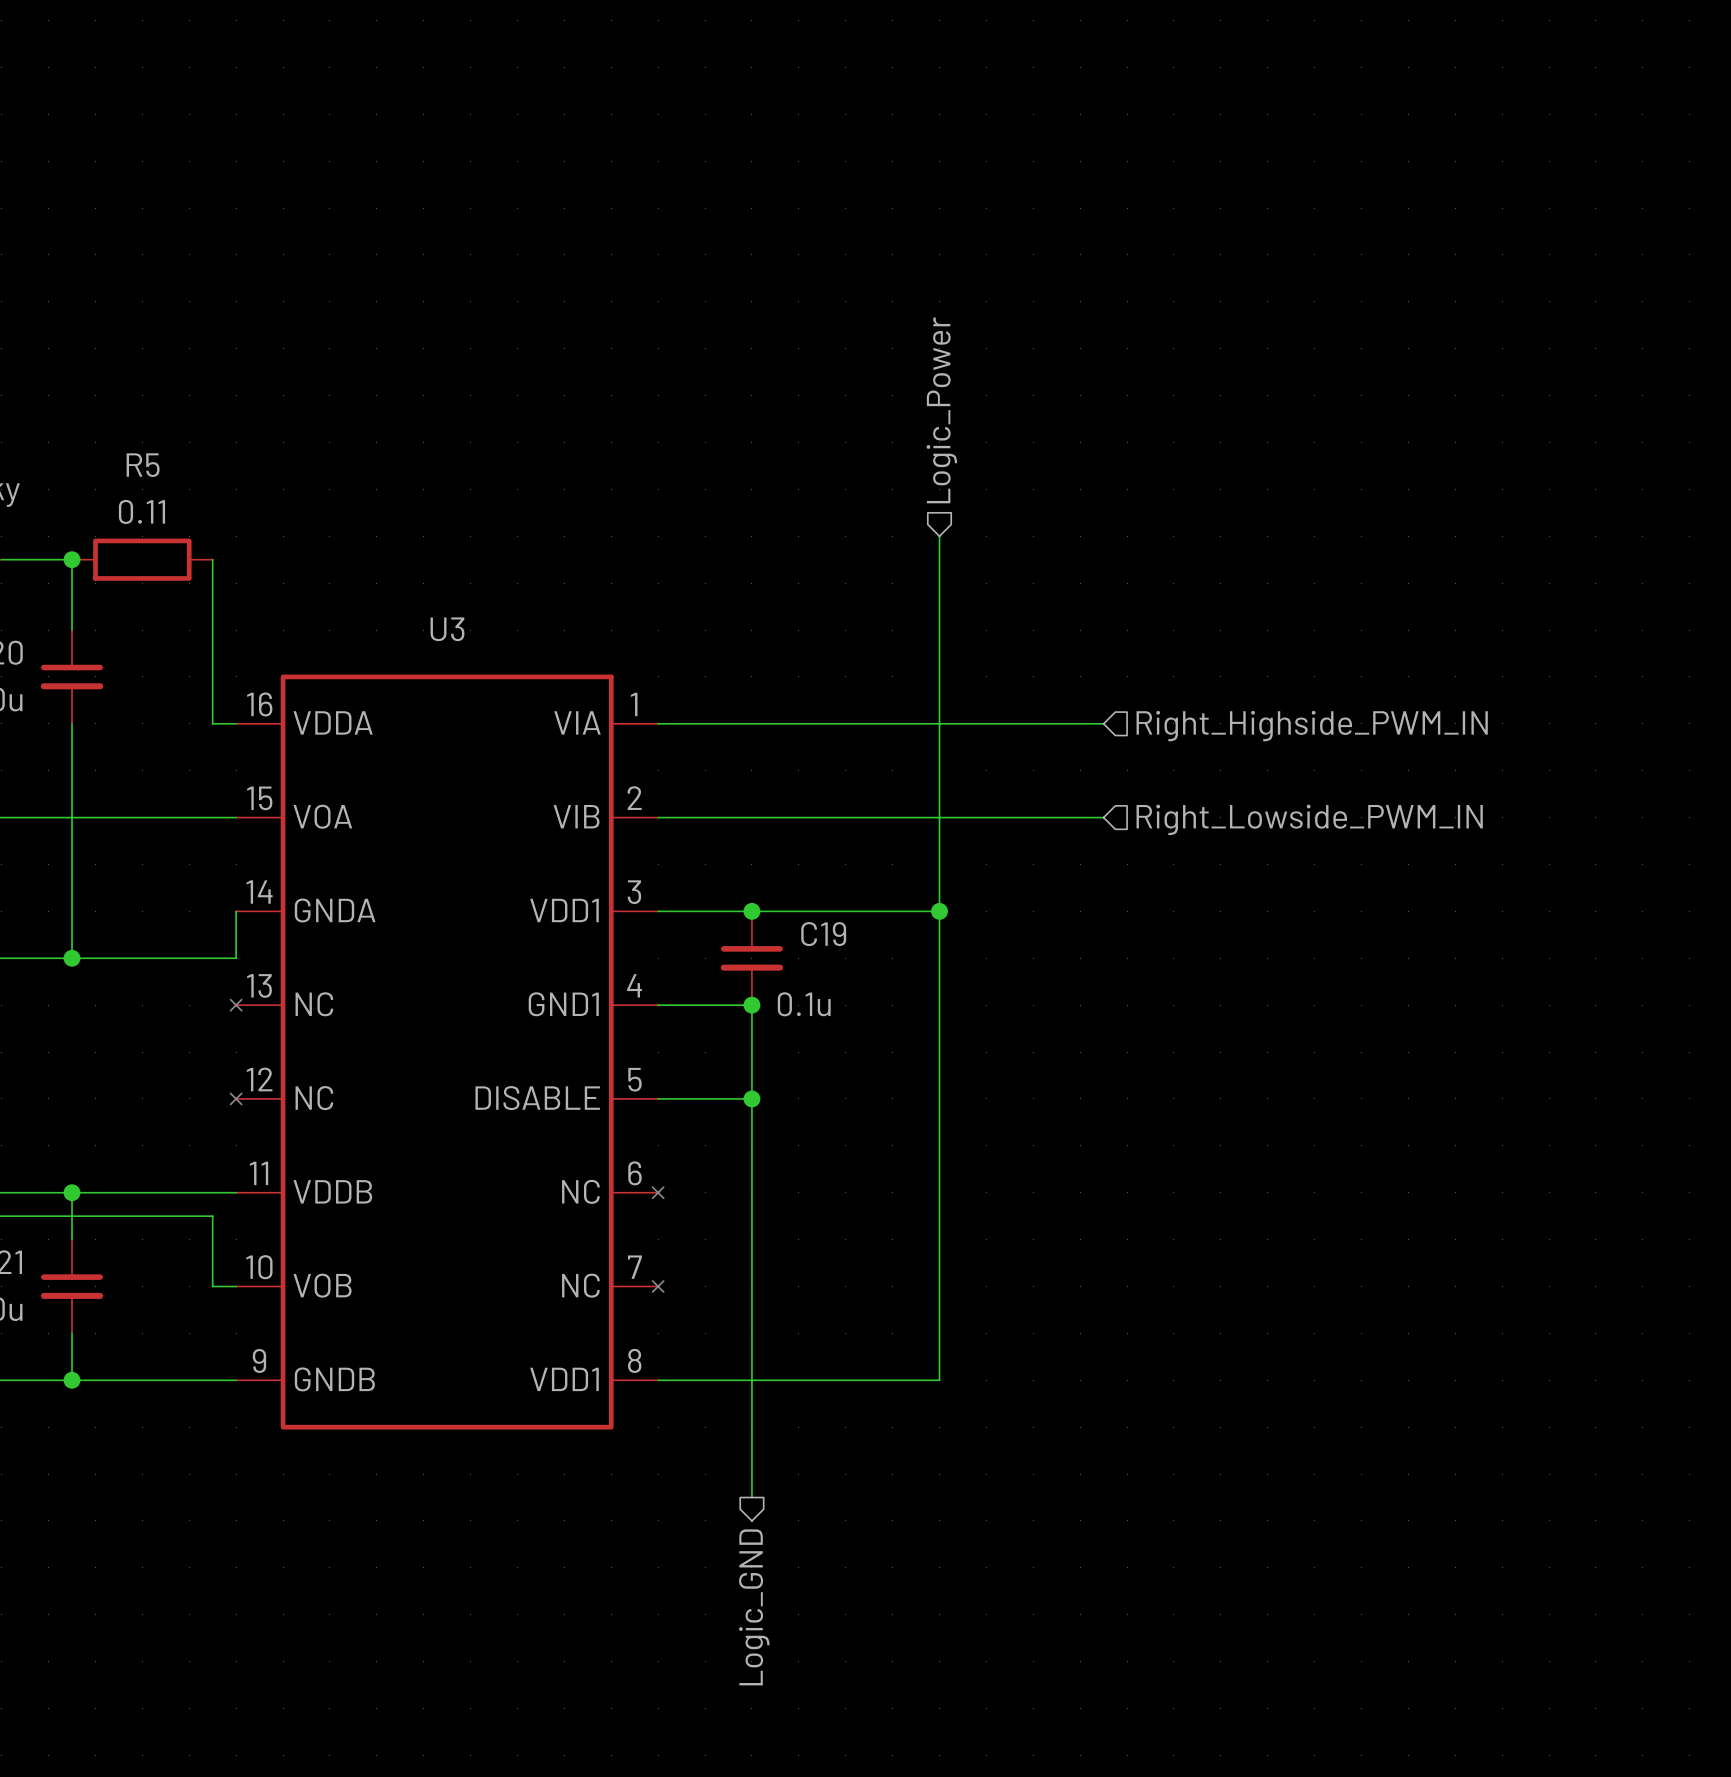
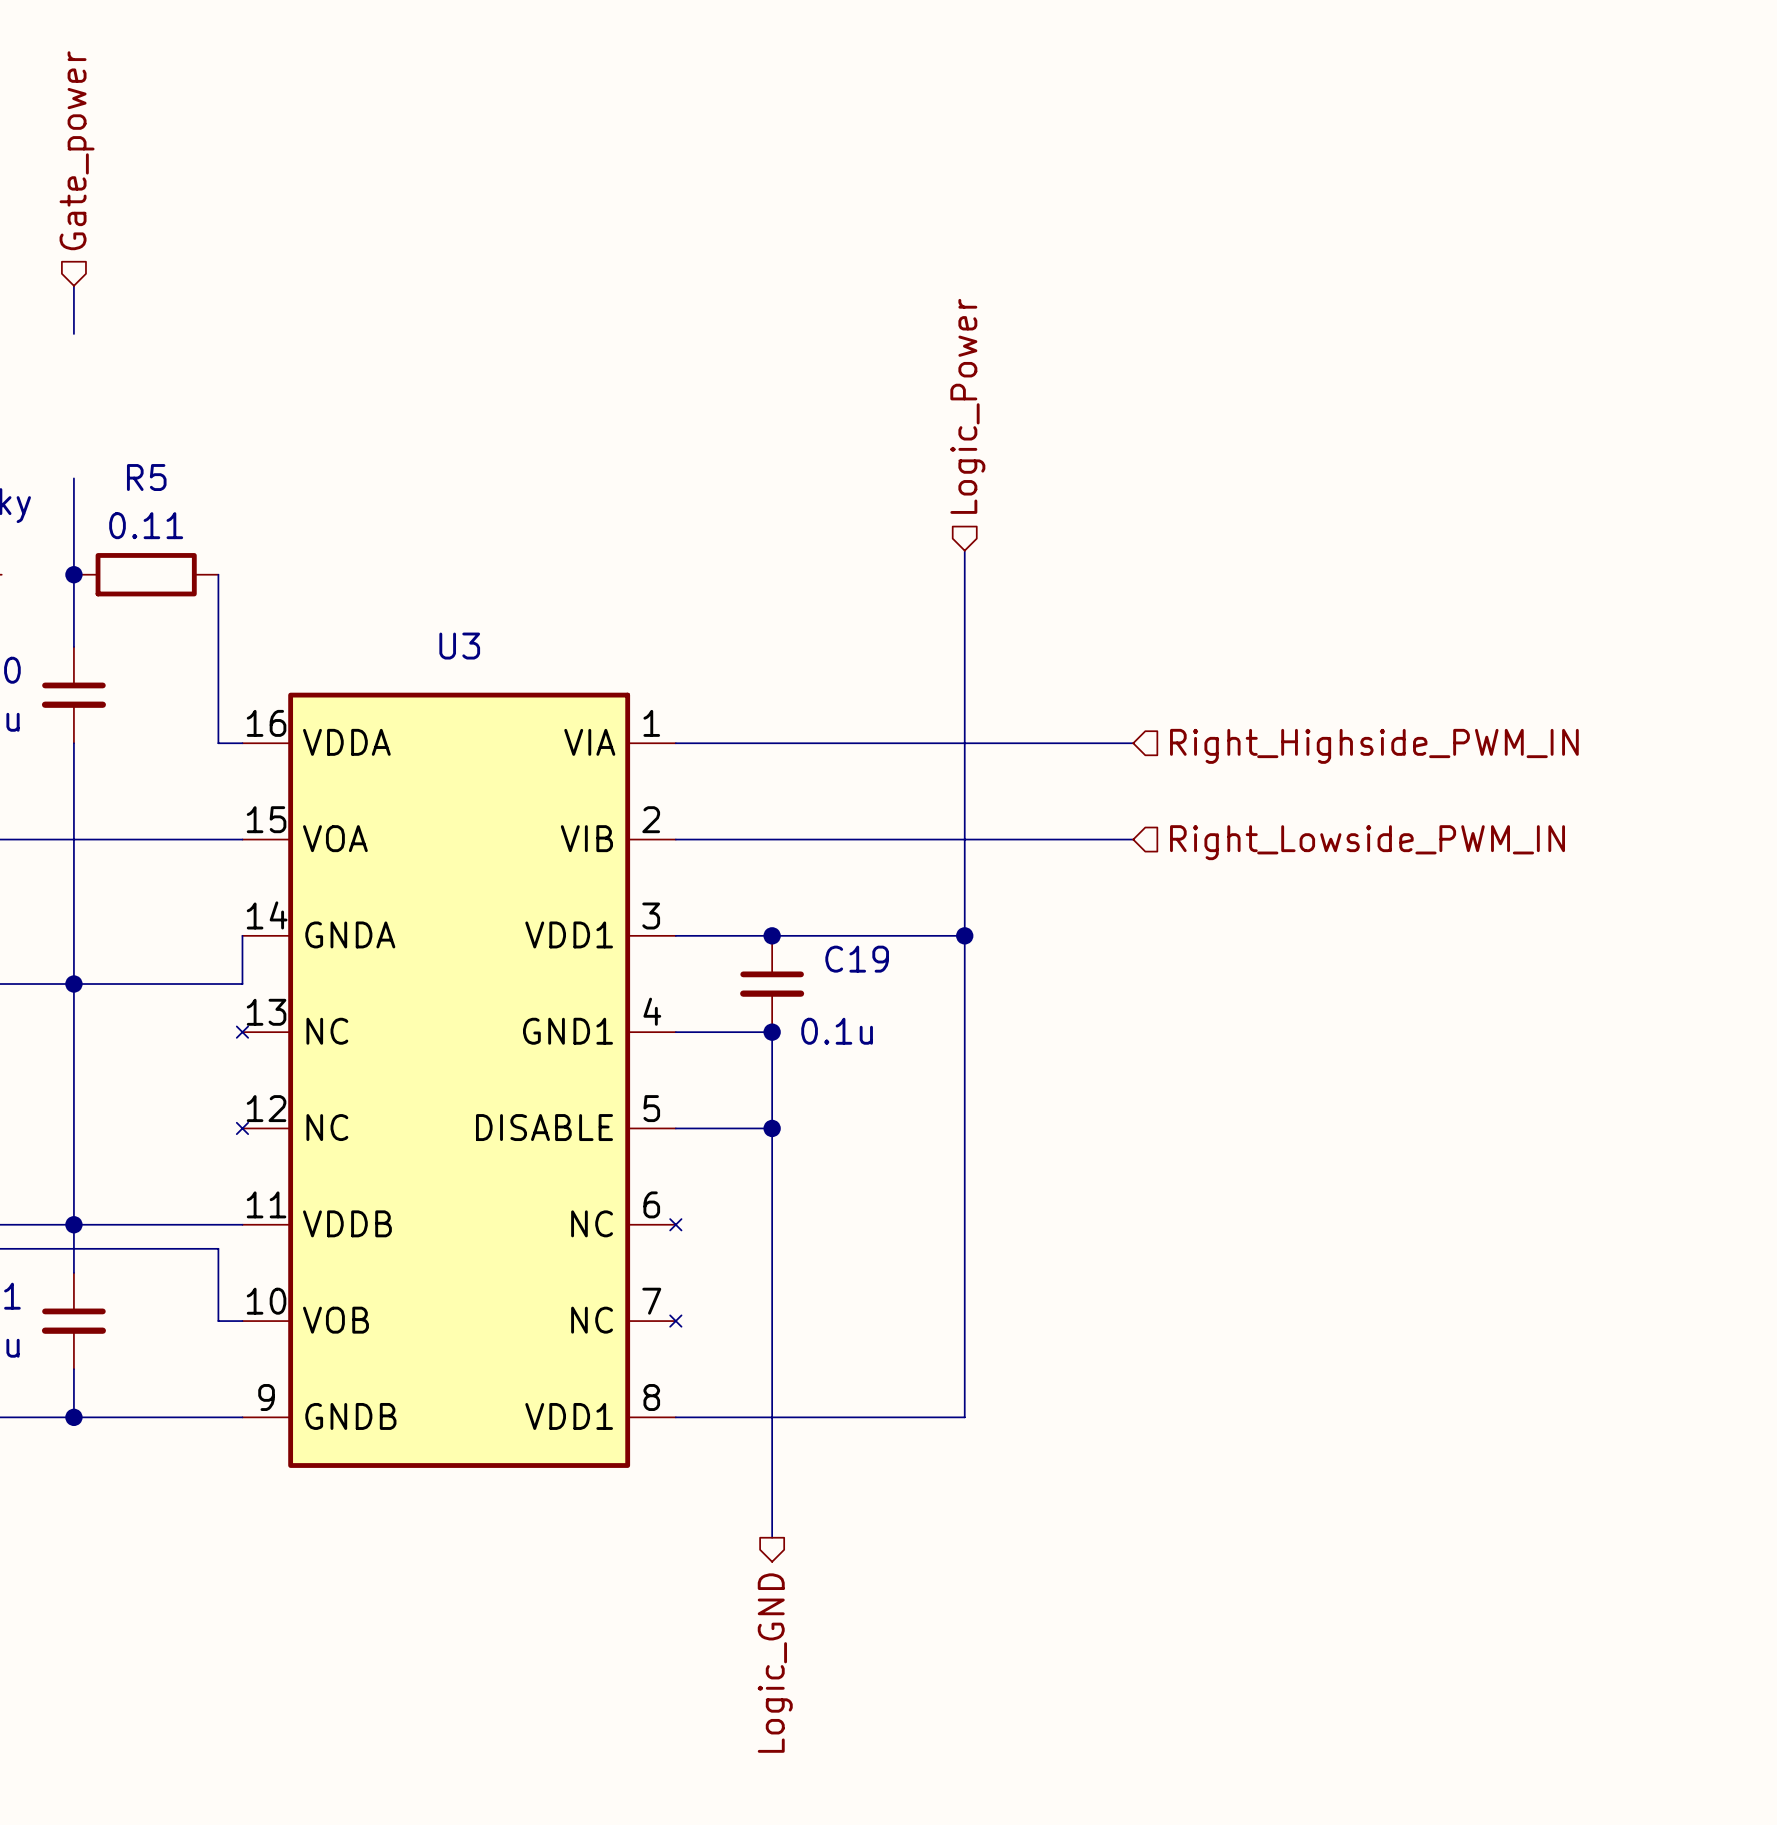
hierarchical label: none -> Gate_power (77, 150)
wire: none -> (73, 285) (73, 333)
wire: (1, 559) (72, 559) -> (73, 478) (73, 574)
wire: none -> (73, 984) (73, 1224)

